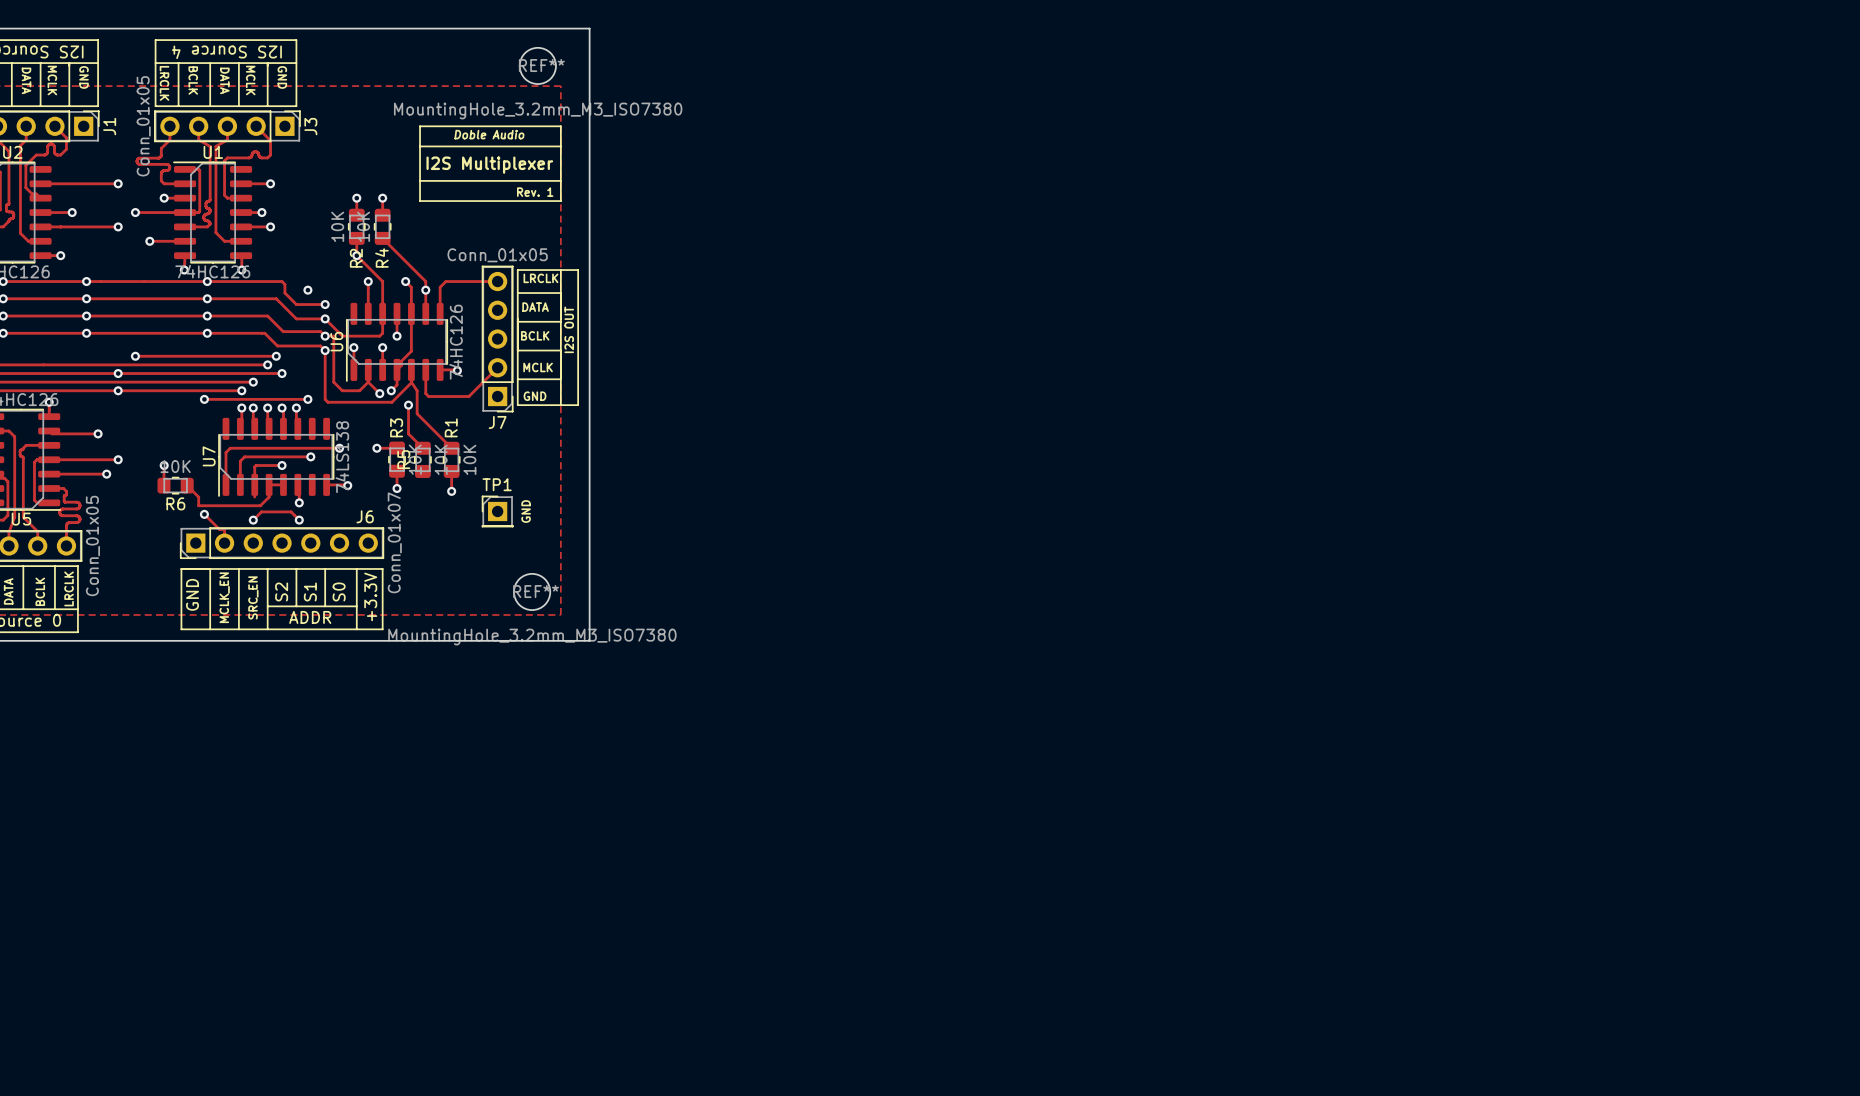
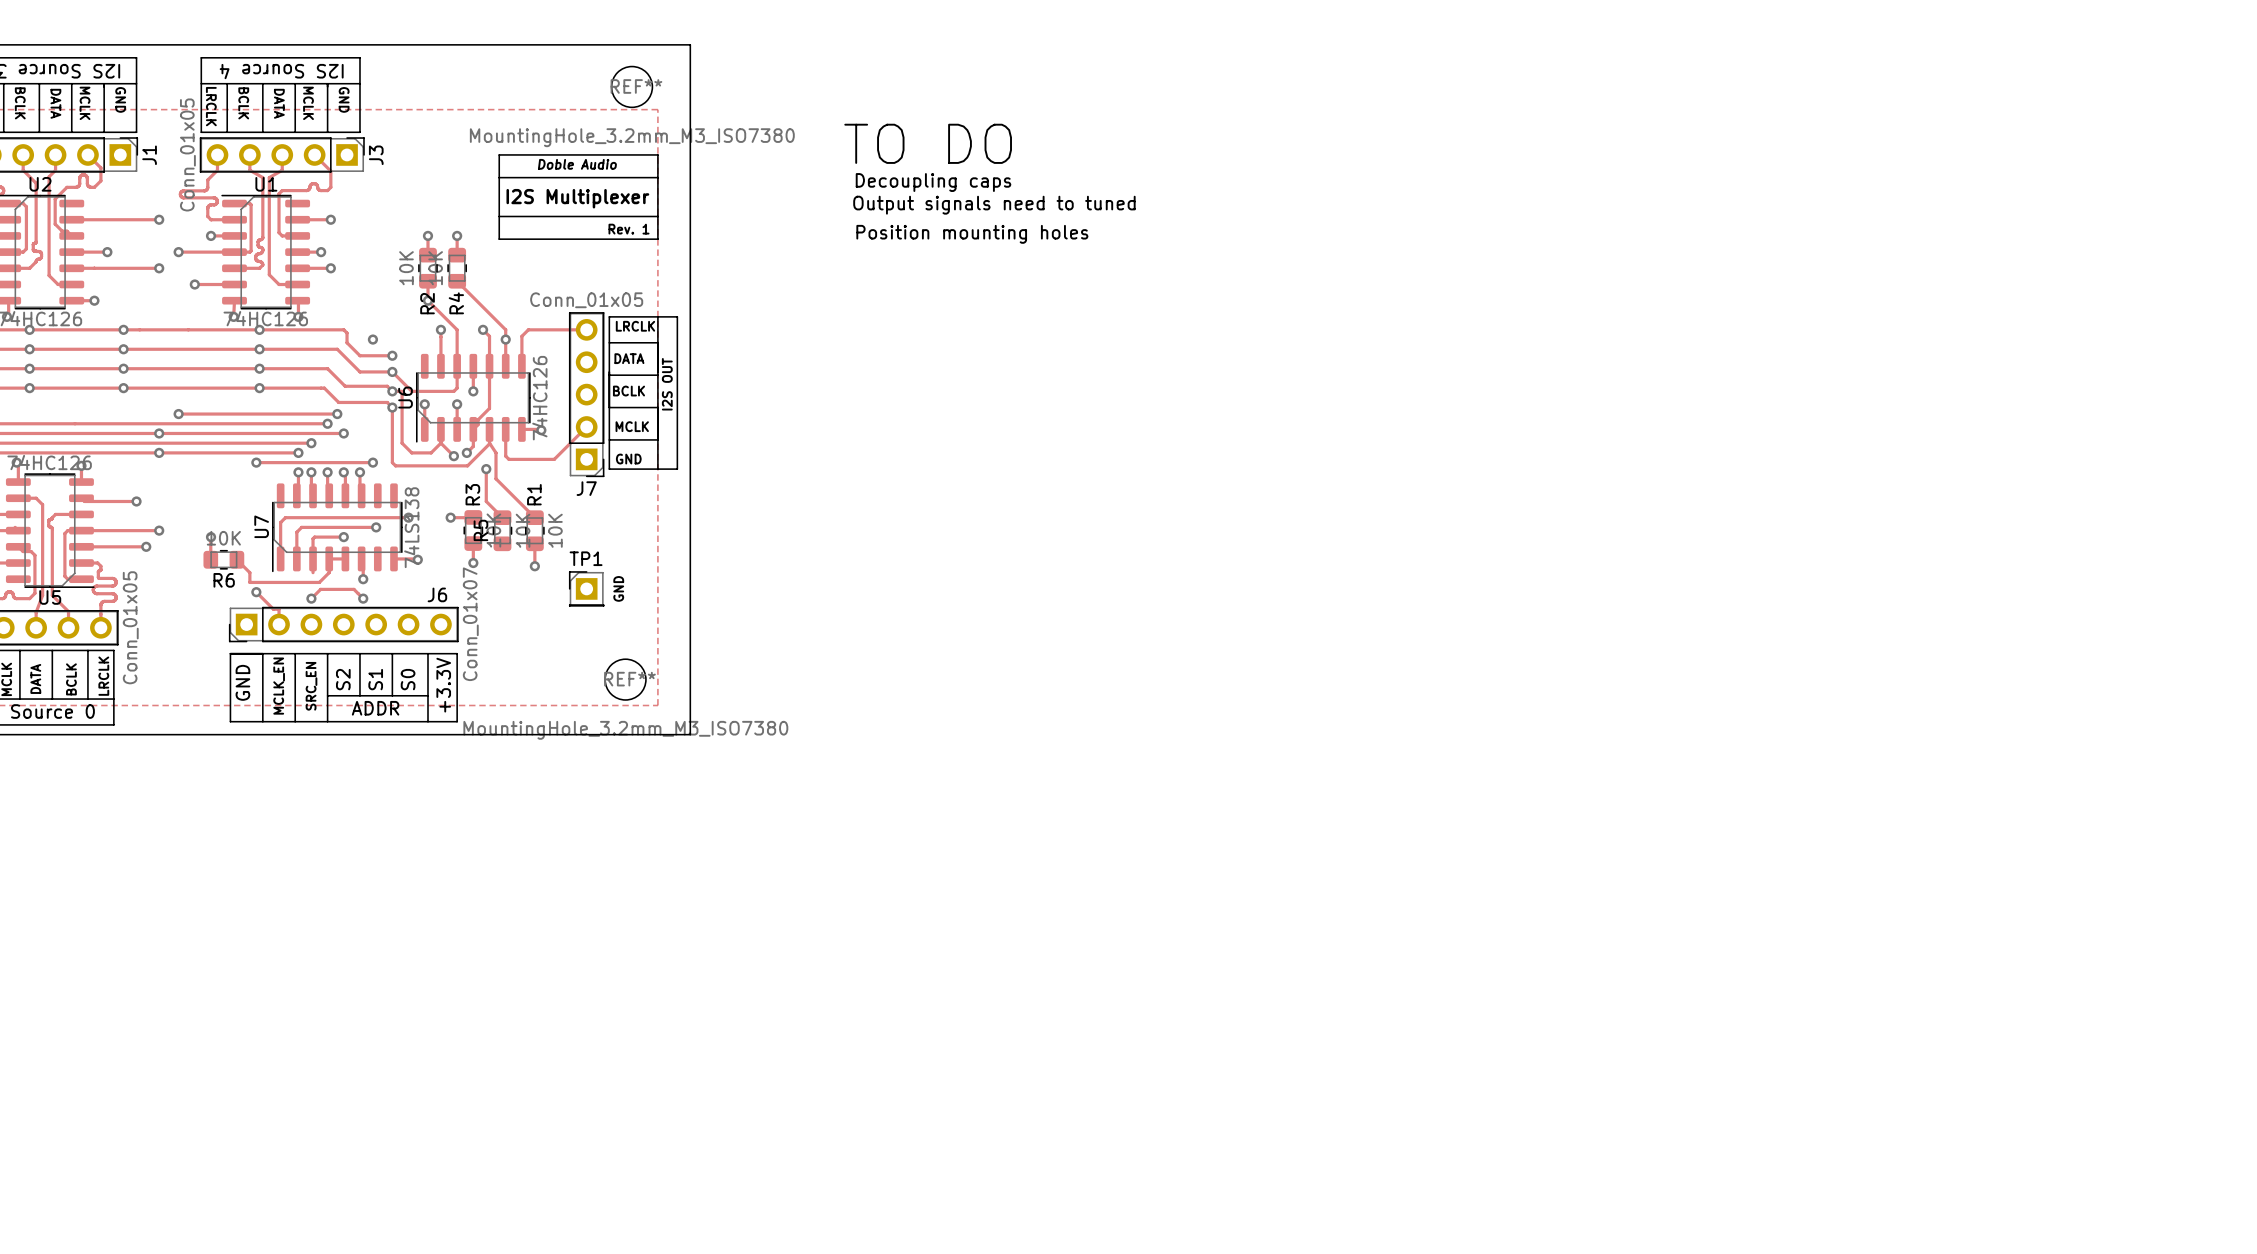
text: none -> TO DO (928, 143)
text: none -> Decoupling caps (933, 182)
text: none -> Output signals need to tuned (994, 205)
text: none -> Position mounting holes (972, 234)

